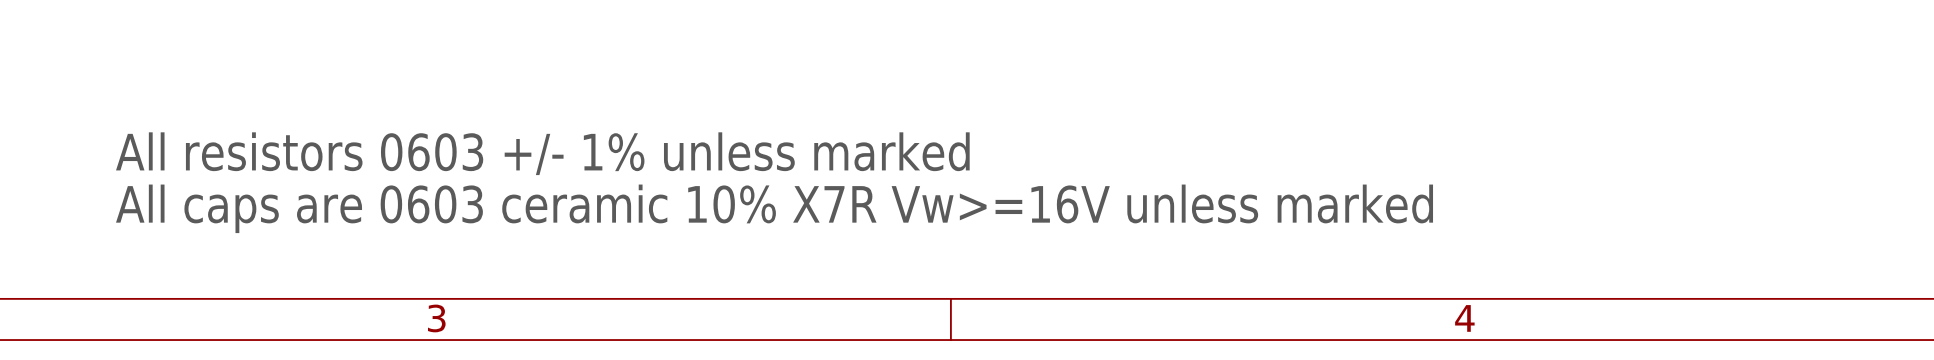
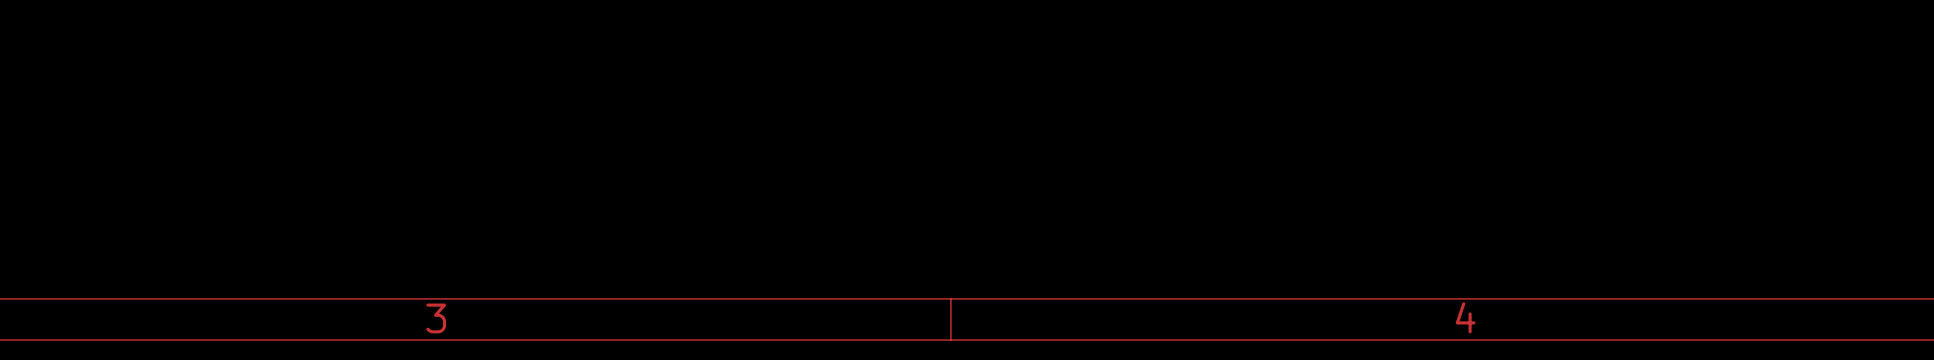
text: All resistors 0603 +/- 1% unless marked (542, 153) -> none
text: All caps are 0603 ceramic 10% X7R Vw>=16V unless marked (774, 208) -> none

